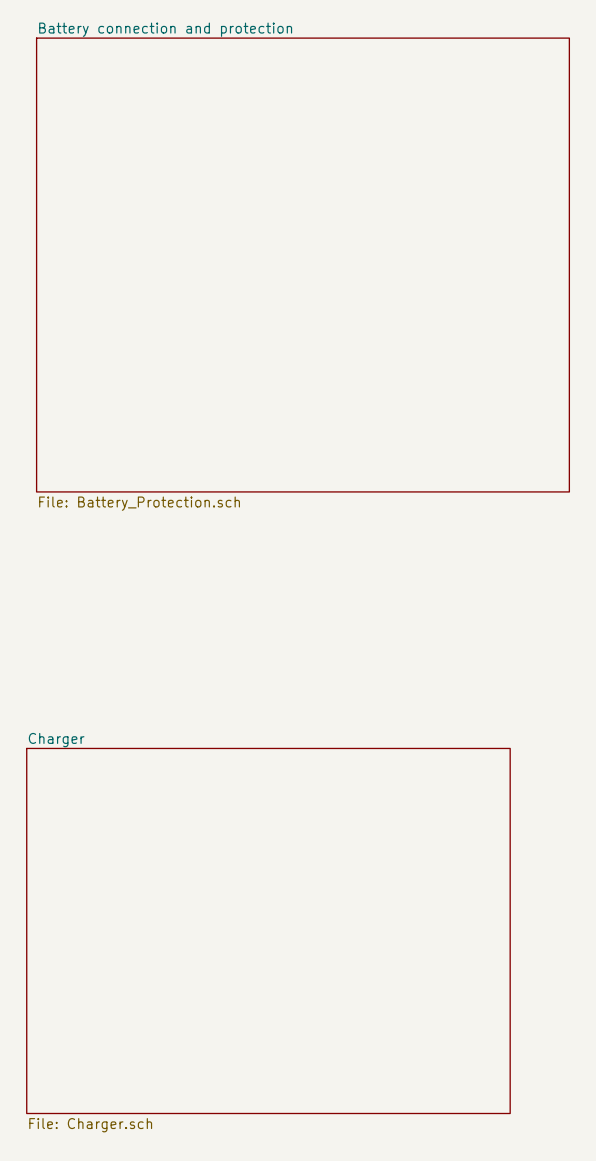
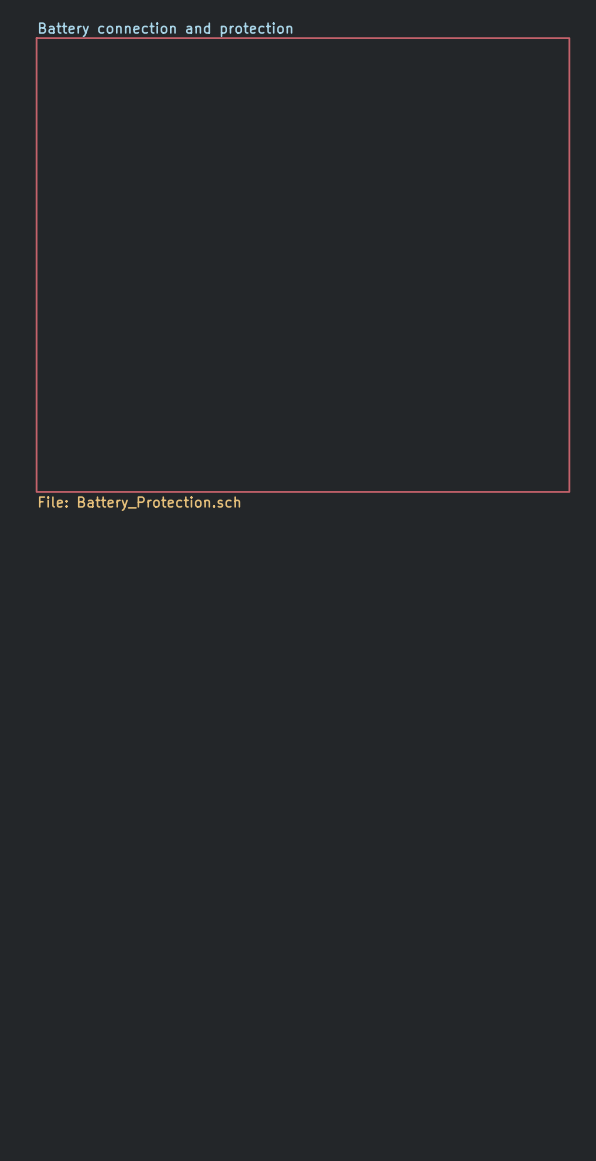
sheet Charger: File: Charger.sch (268, 930) -> none

